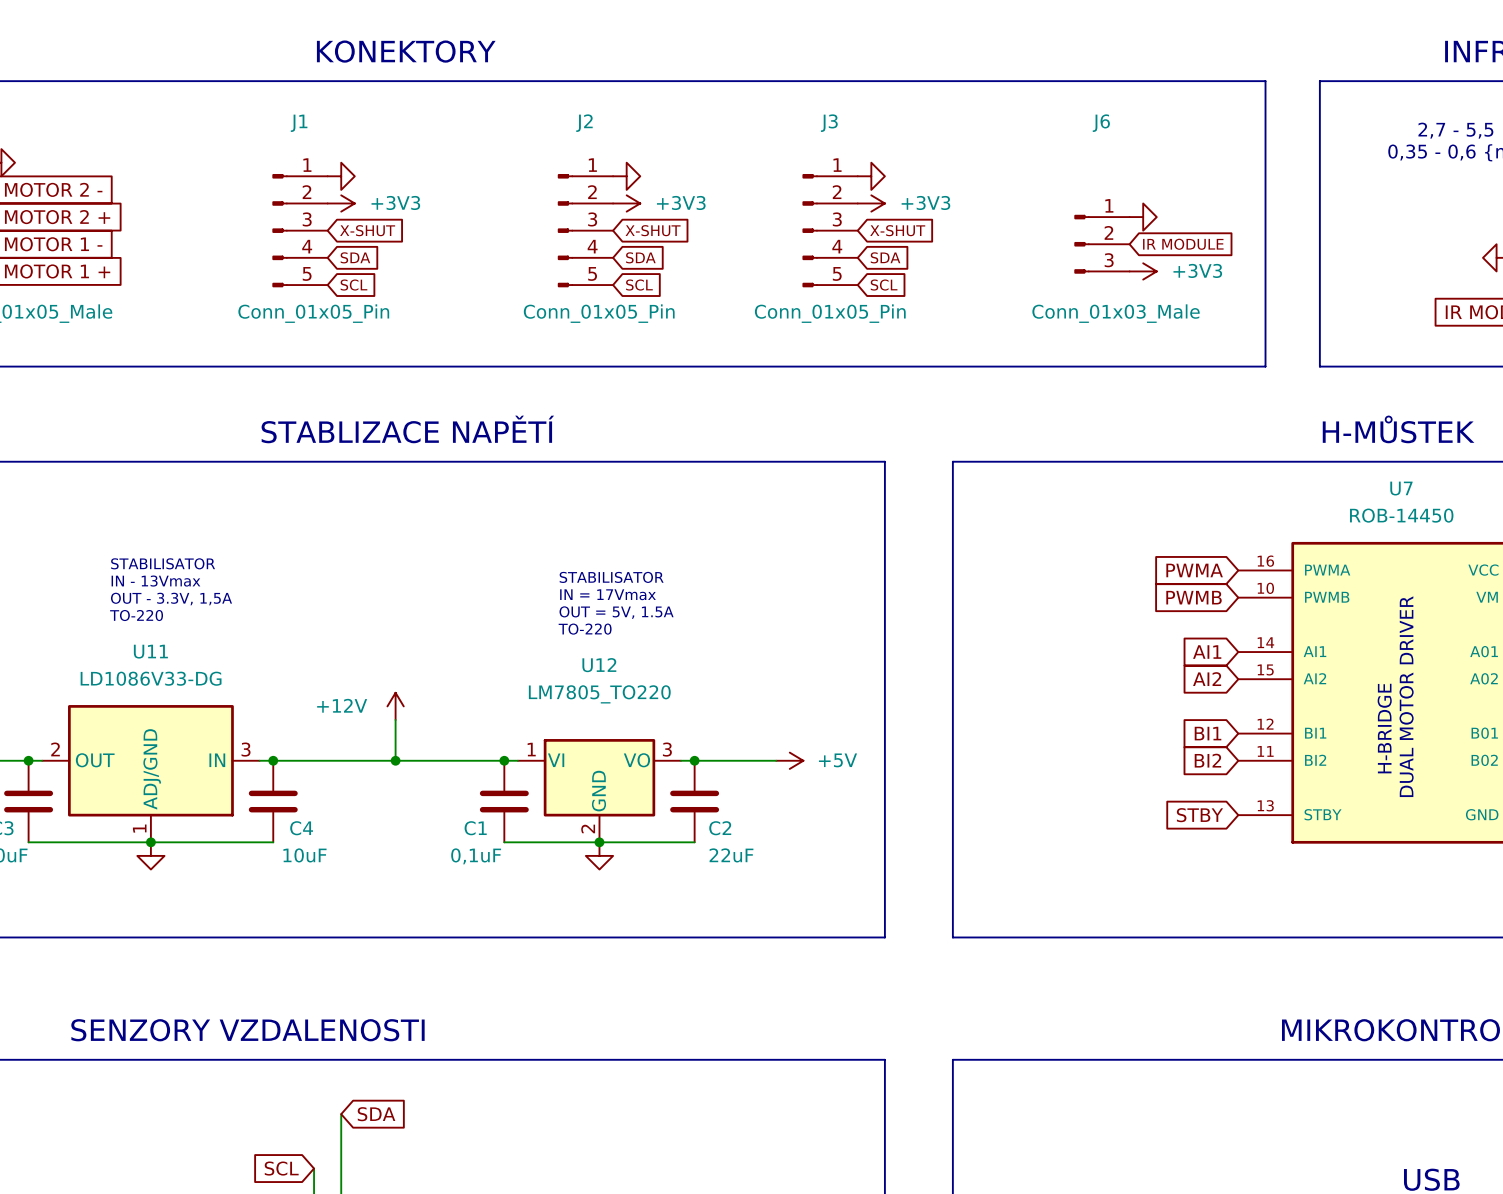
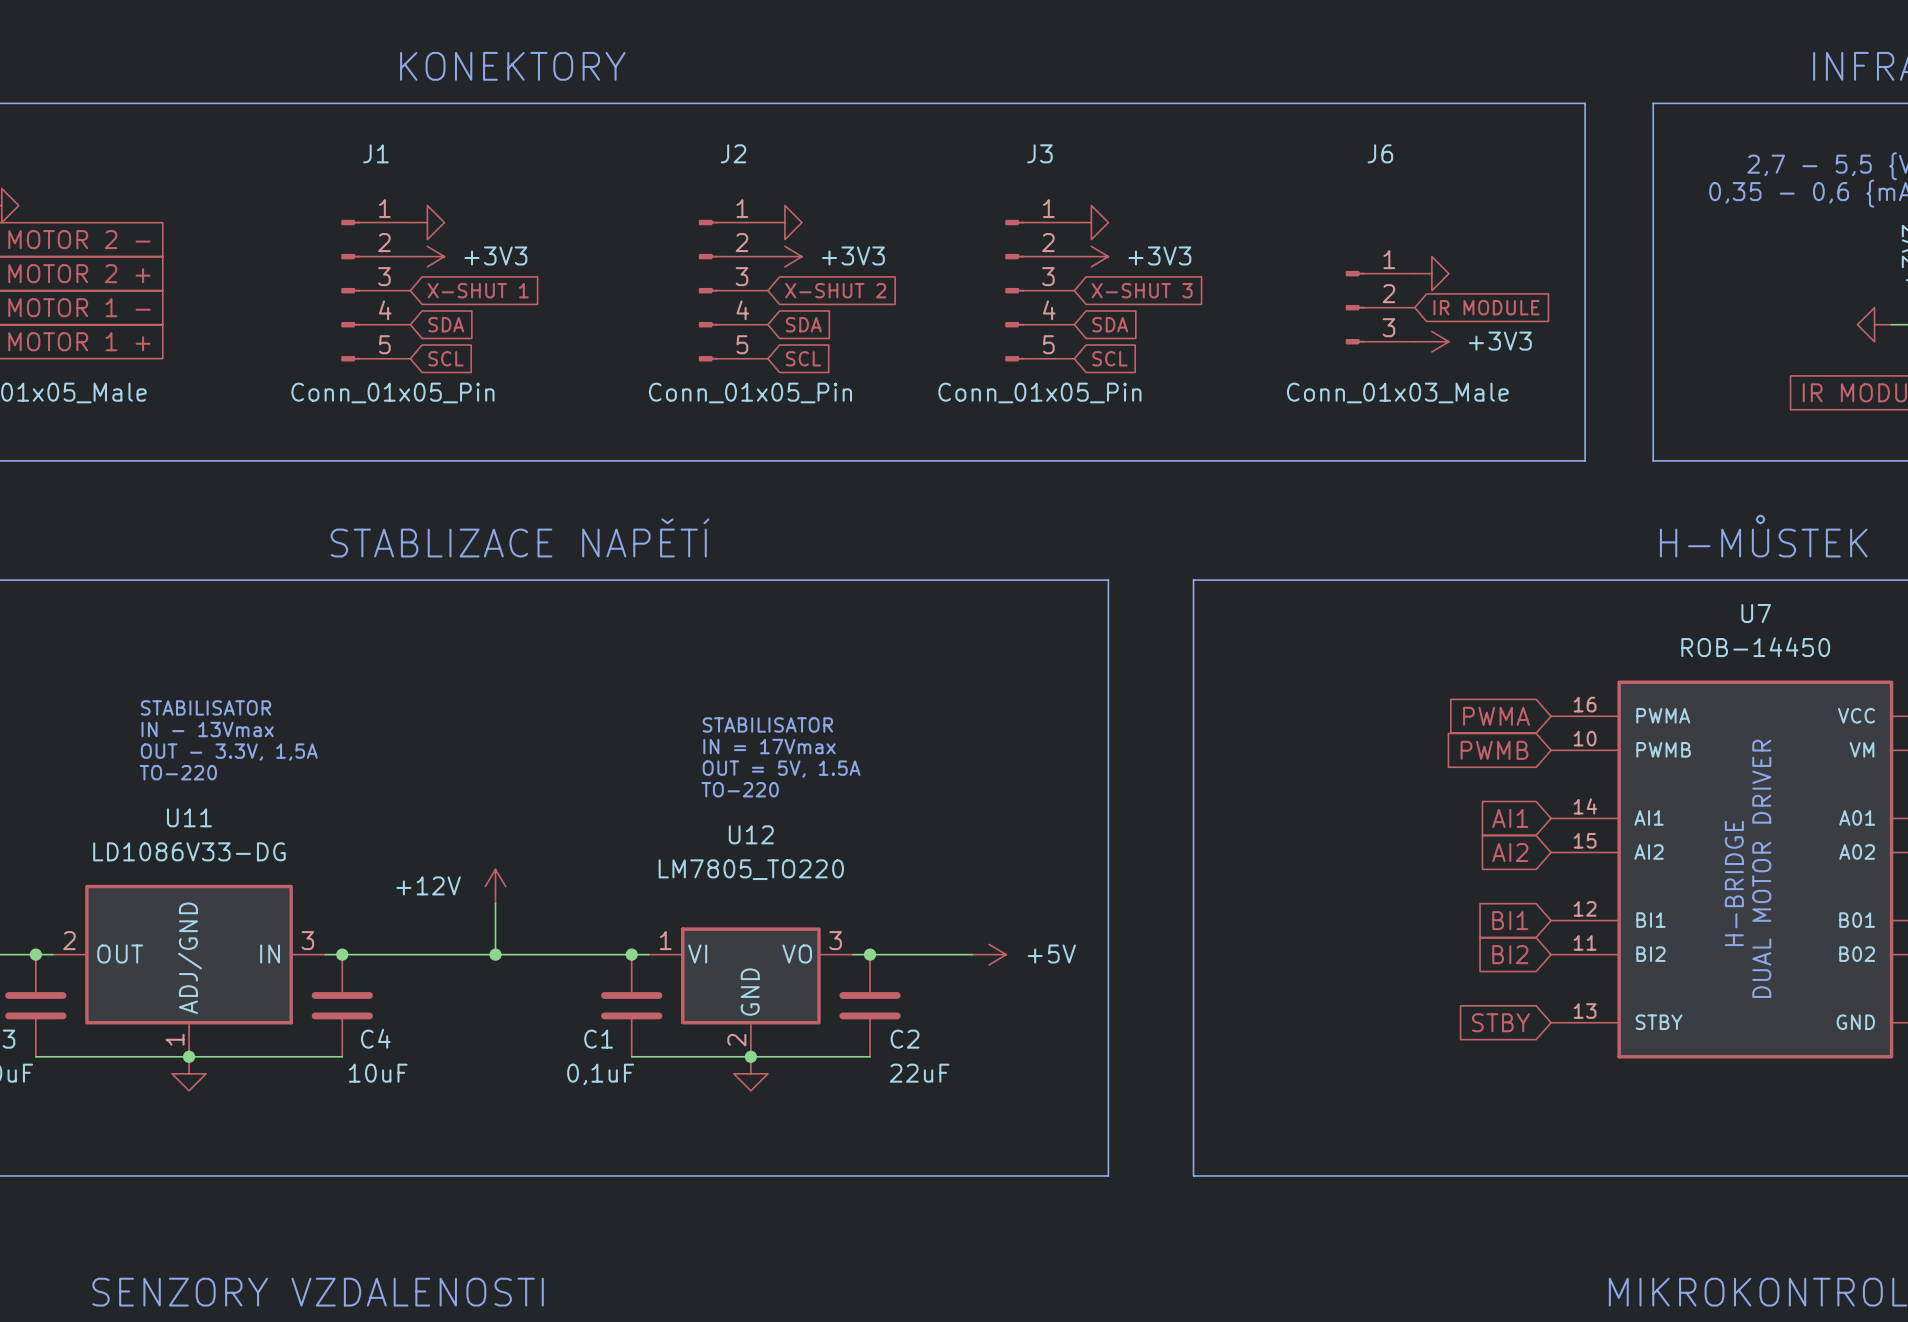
global label: X-SHUT (367, 230) -> X-SHUT 1 (478, 290)
global label: X-SHUT (653, 230) -> X-SHUT 2 (835, 290)
global label: X-SHUT (897, 230) -> X-SHUT 3 (1142, 290)

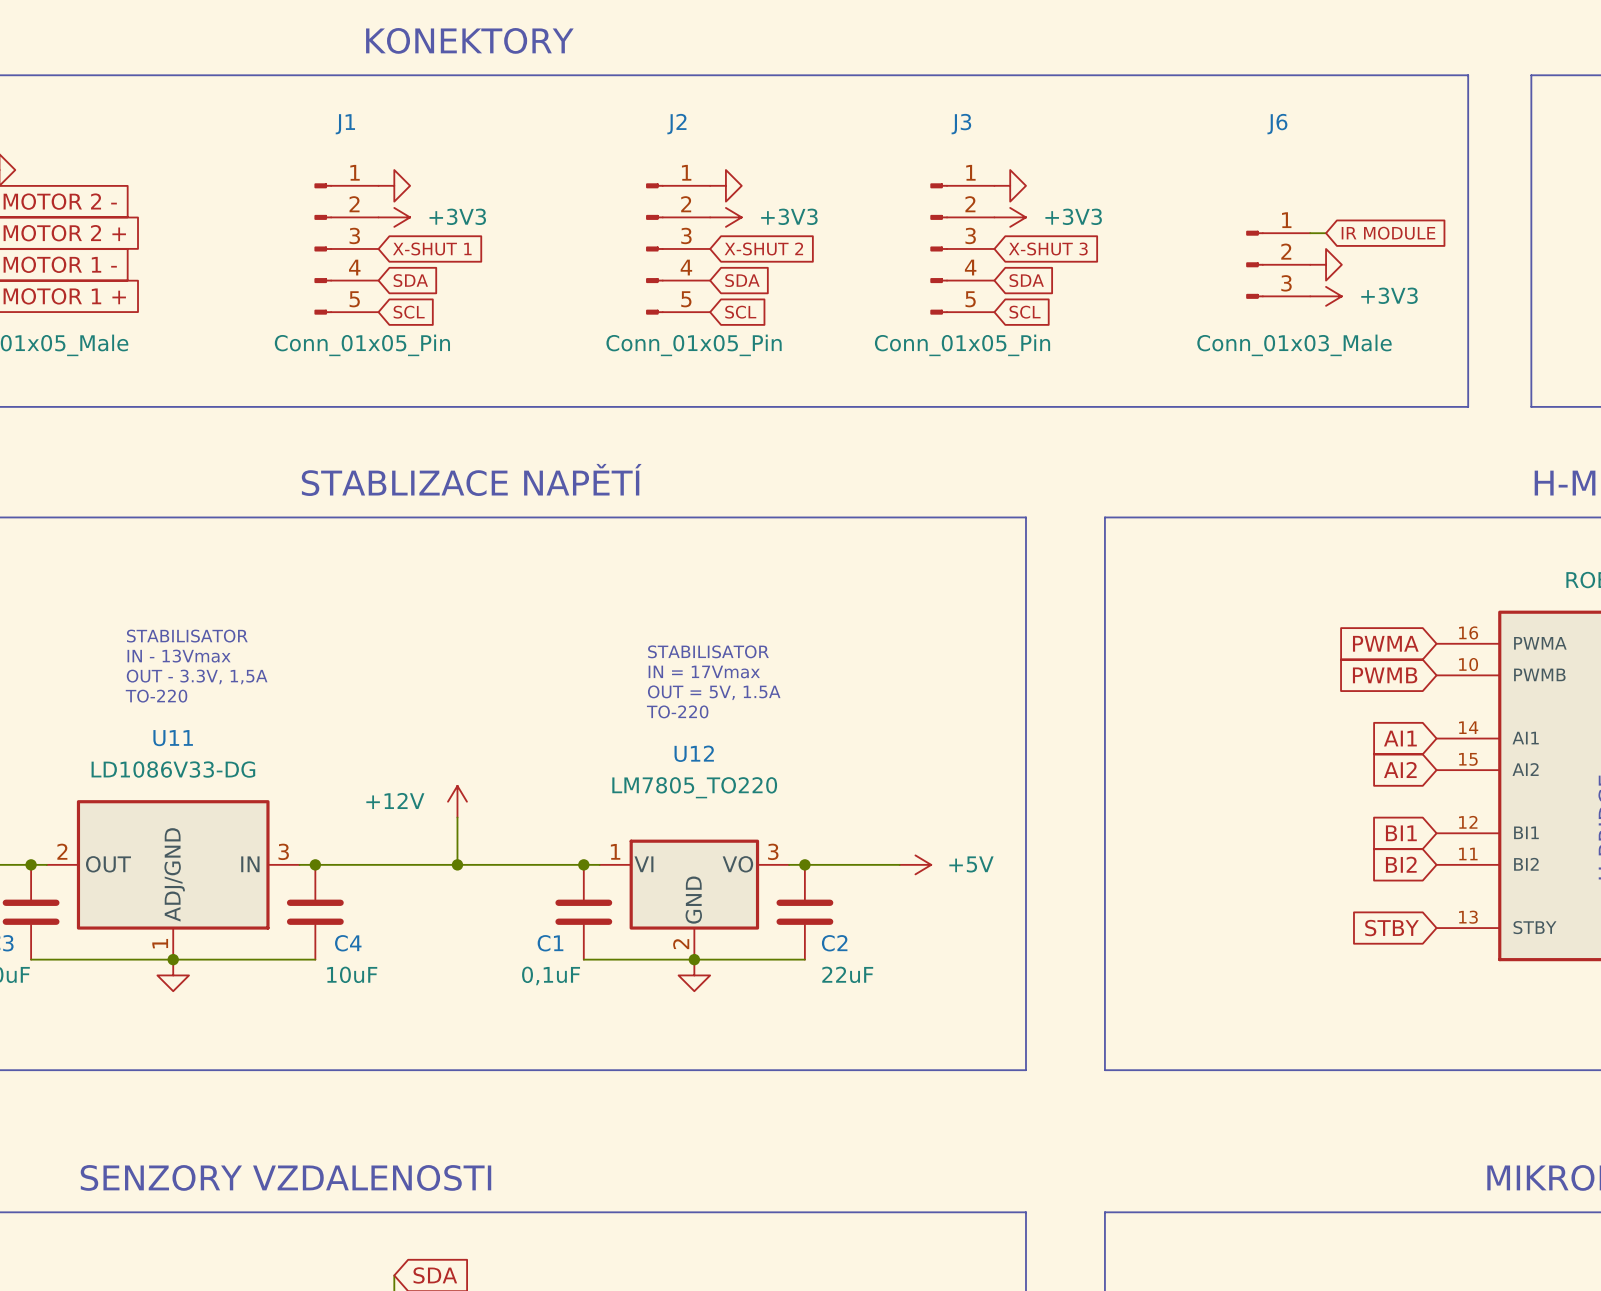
power symbol position: (1431, 273) -> (1326, 264)
global label position: IR MODULE (1486, 307) -> IR MODULE (1388, 233)

